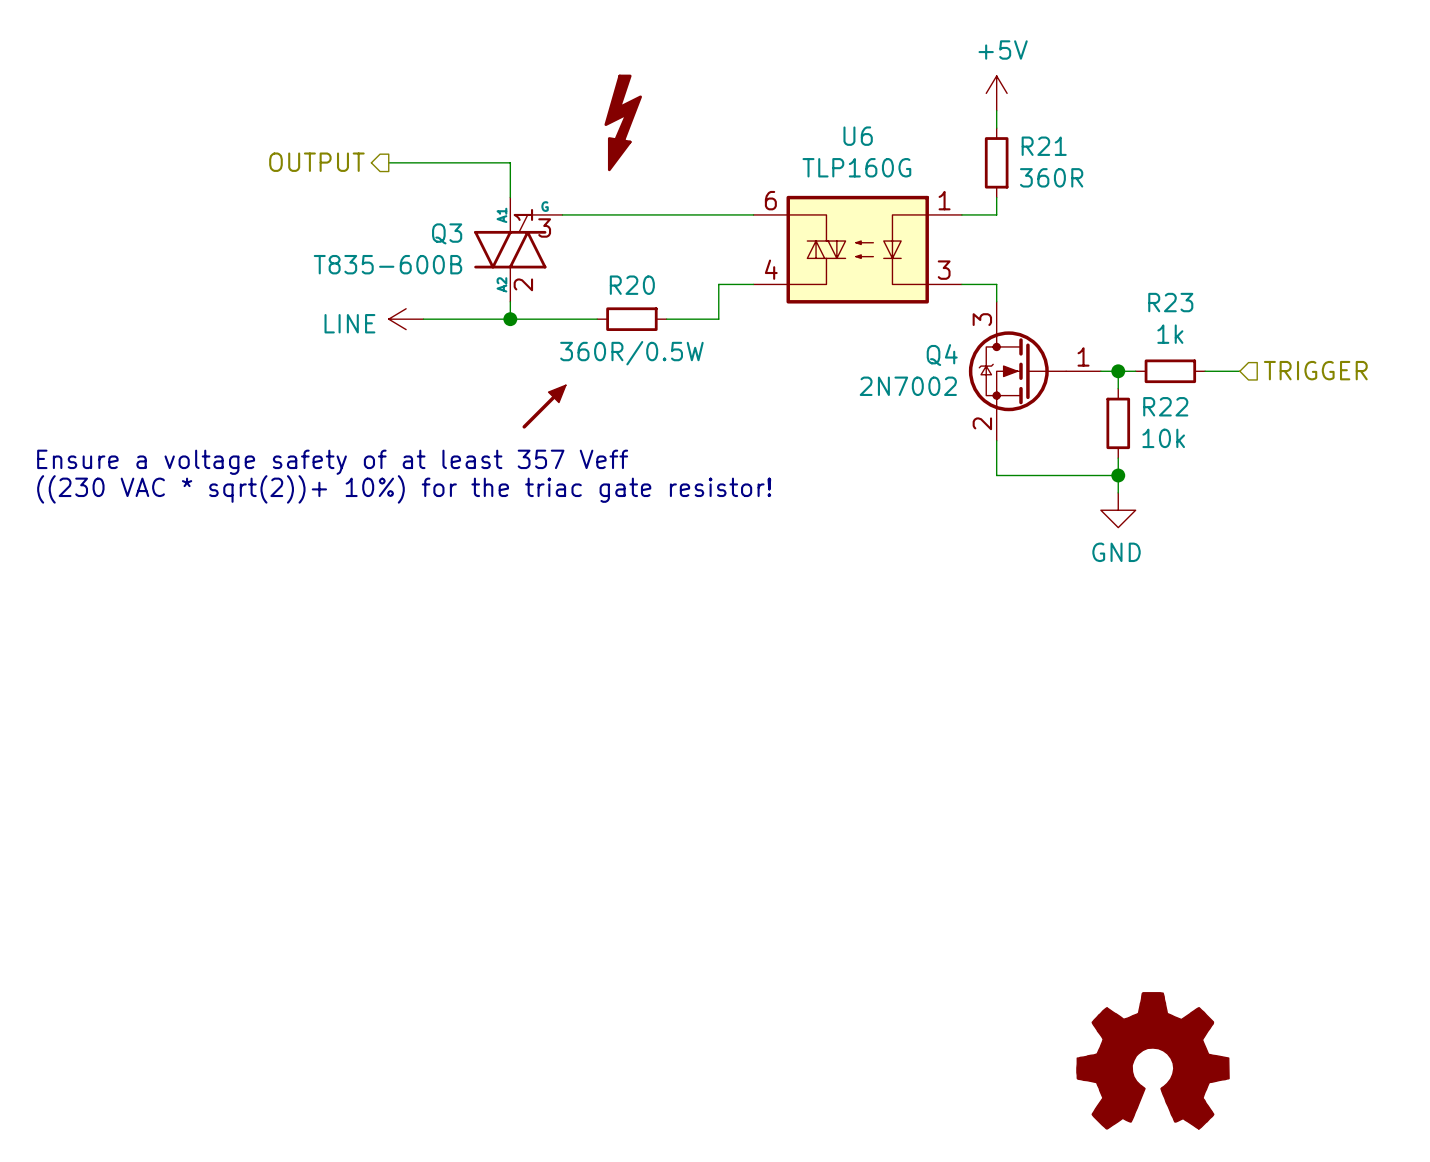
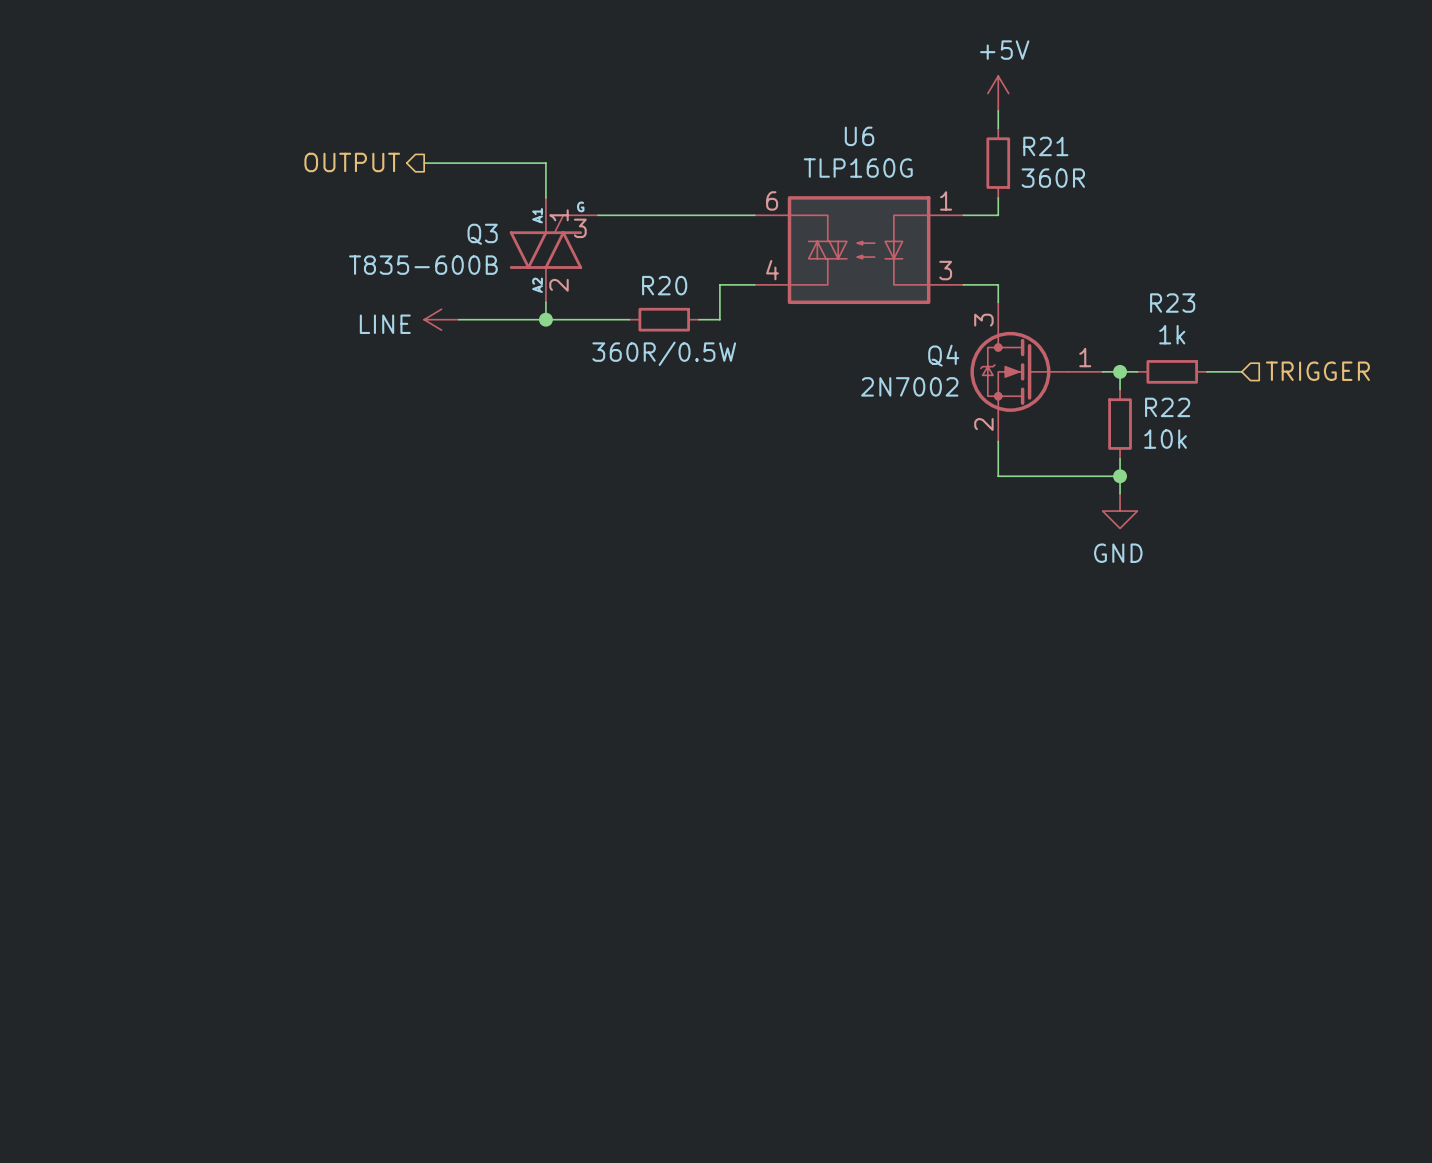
power symbol: (623, 122) -> none
hierarchical label position: OUTPUT (316, 162) -> OUTPUT (352, 162)
wire: (388, 162) (423, 162) -> none
wire: (510, 162) (510, 197) -> (511, 163) (545, 163) (545, 197)
Q3 position: (518, 249) -> (553, 250)
wire: (510, 301) (510, 319) -> (545, 302) (545, 319)
power symbol position: LINE (406, 319) -> LINE (441, 319)
junction position: (510, 319) -> (545, 319)
R20 position: (631, 319) -> (664, 319)
wire: (666, 319) (697, 319) -> (598, 319) (629, 319)
power symbol: (544, 406) -> none
text: Ensure a voltage safety of at least 357 Veff (332, 462) -> none
text: ((230 VAC * sqrt(2))+ 10%) for the triac gate resistor! (404, 489) -> none
power symbol: (1153, 1060) -> none

